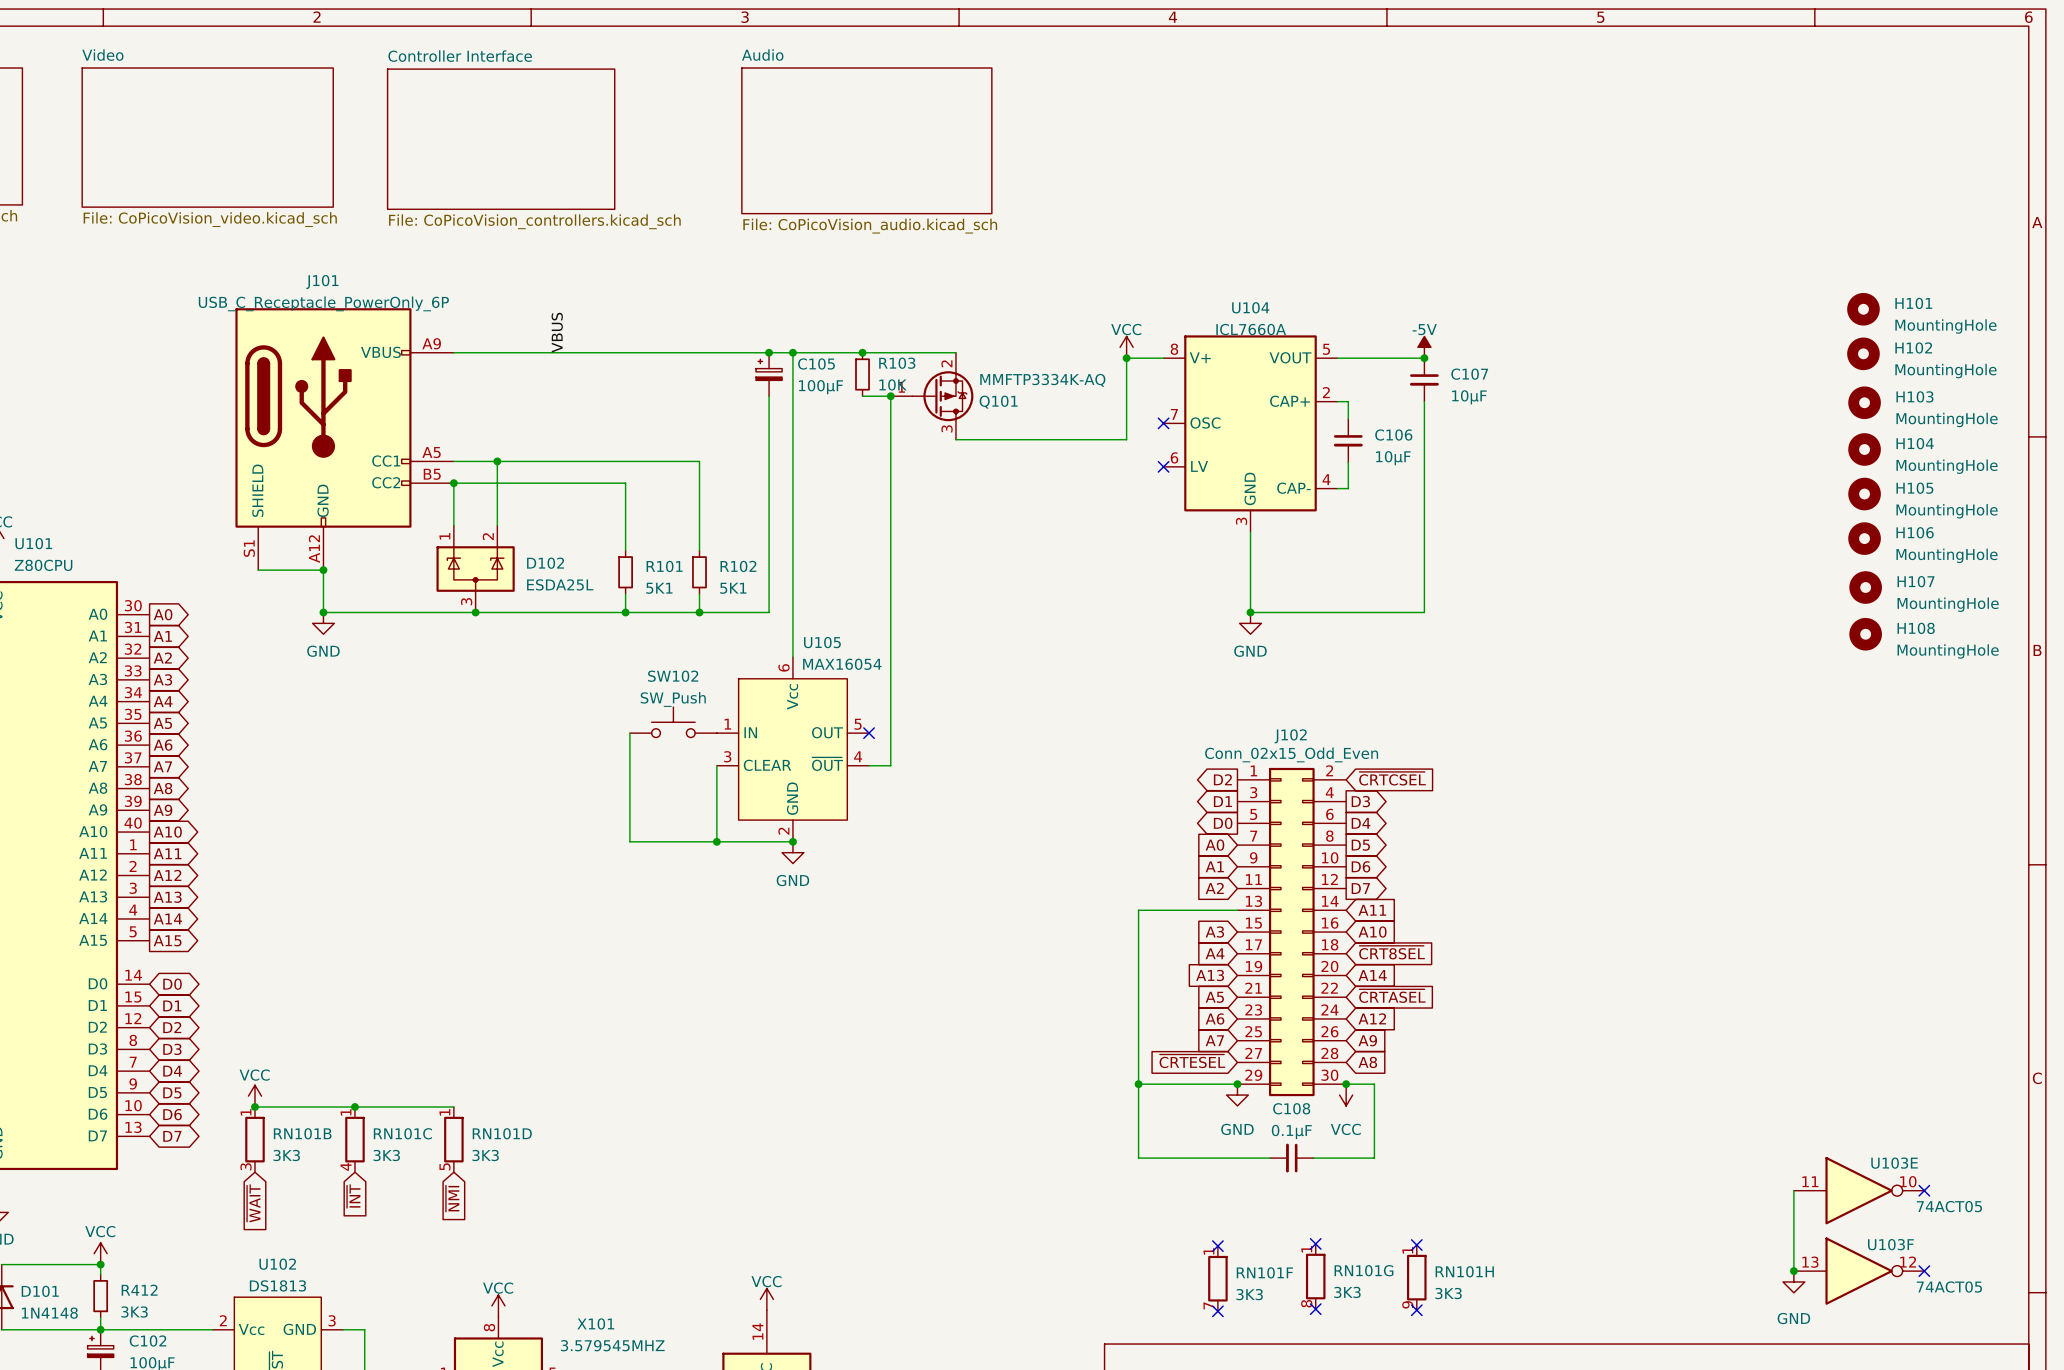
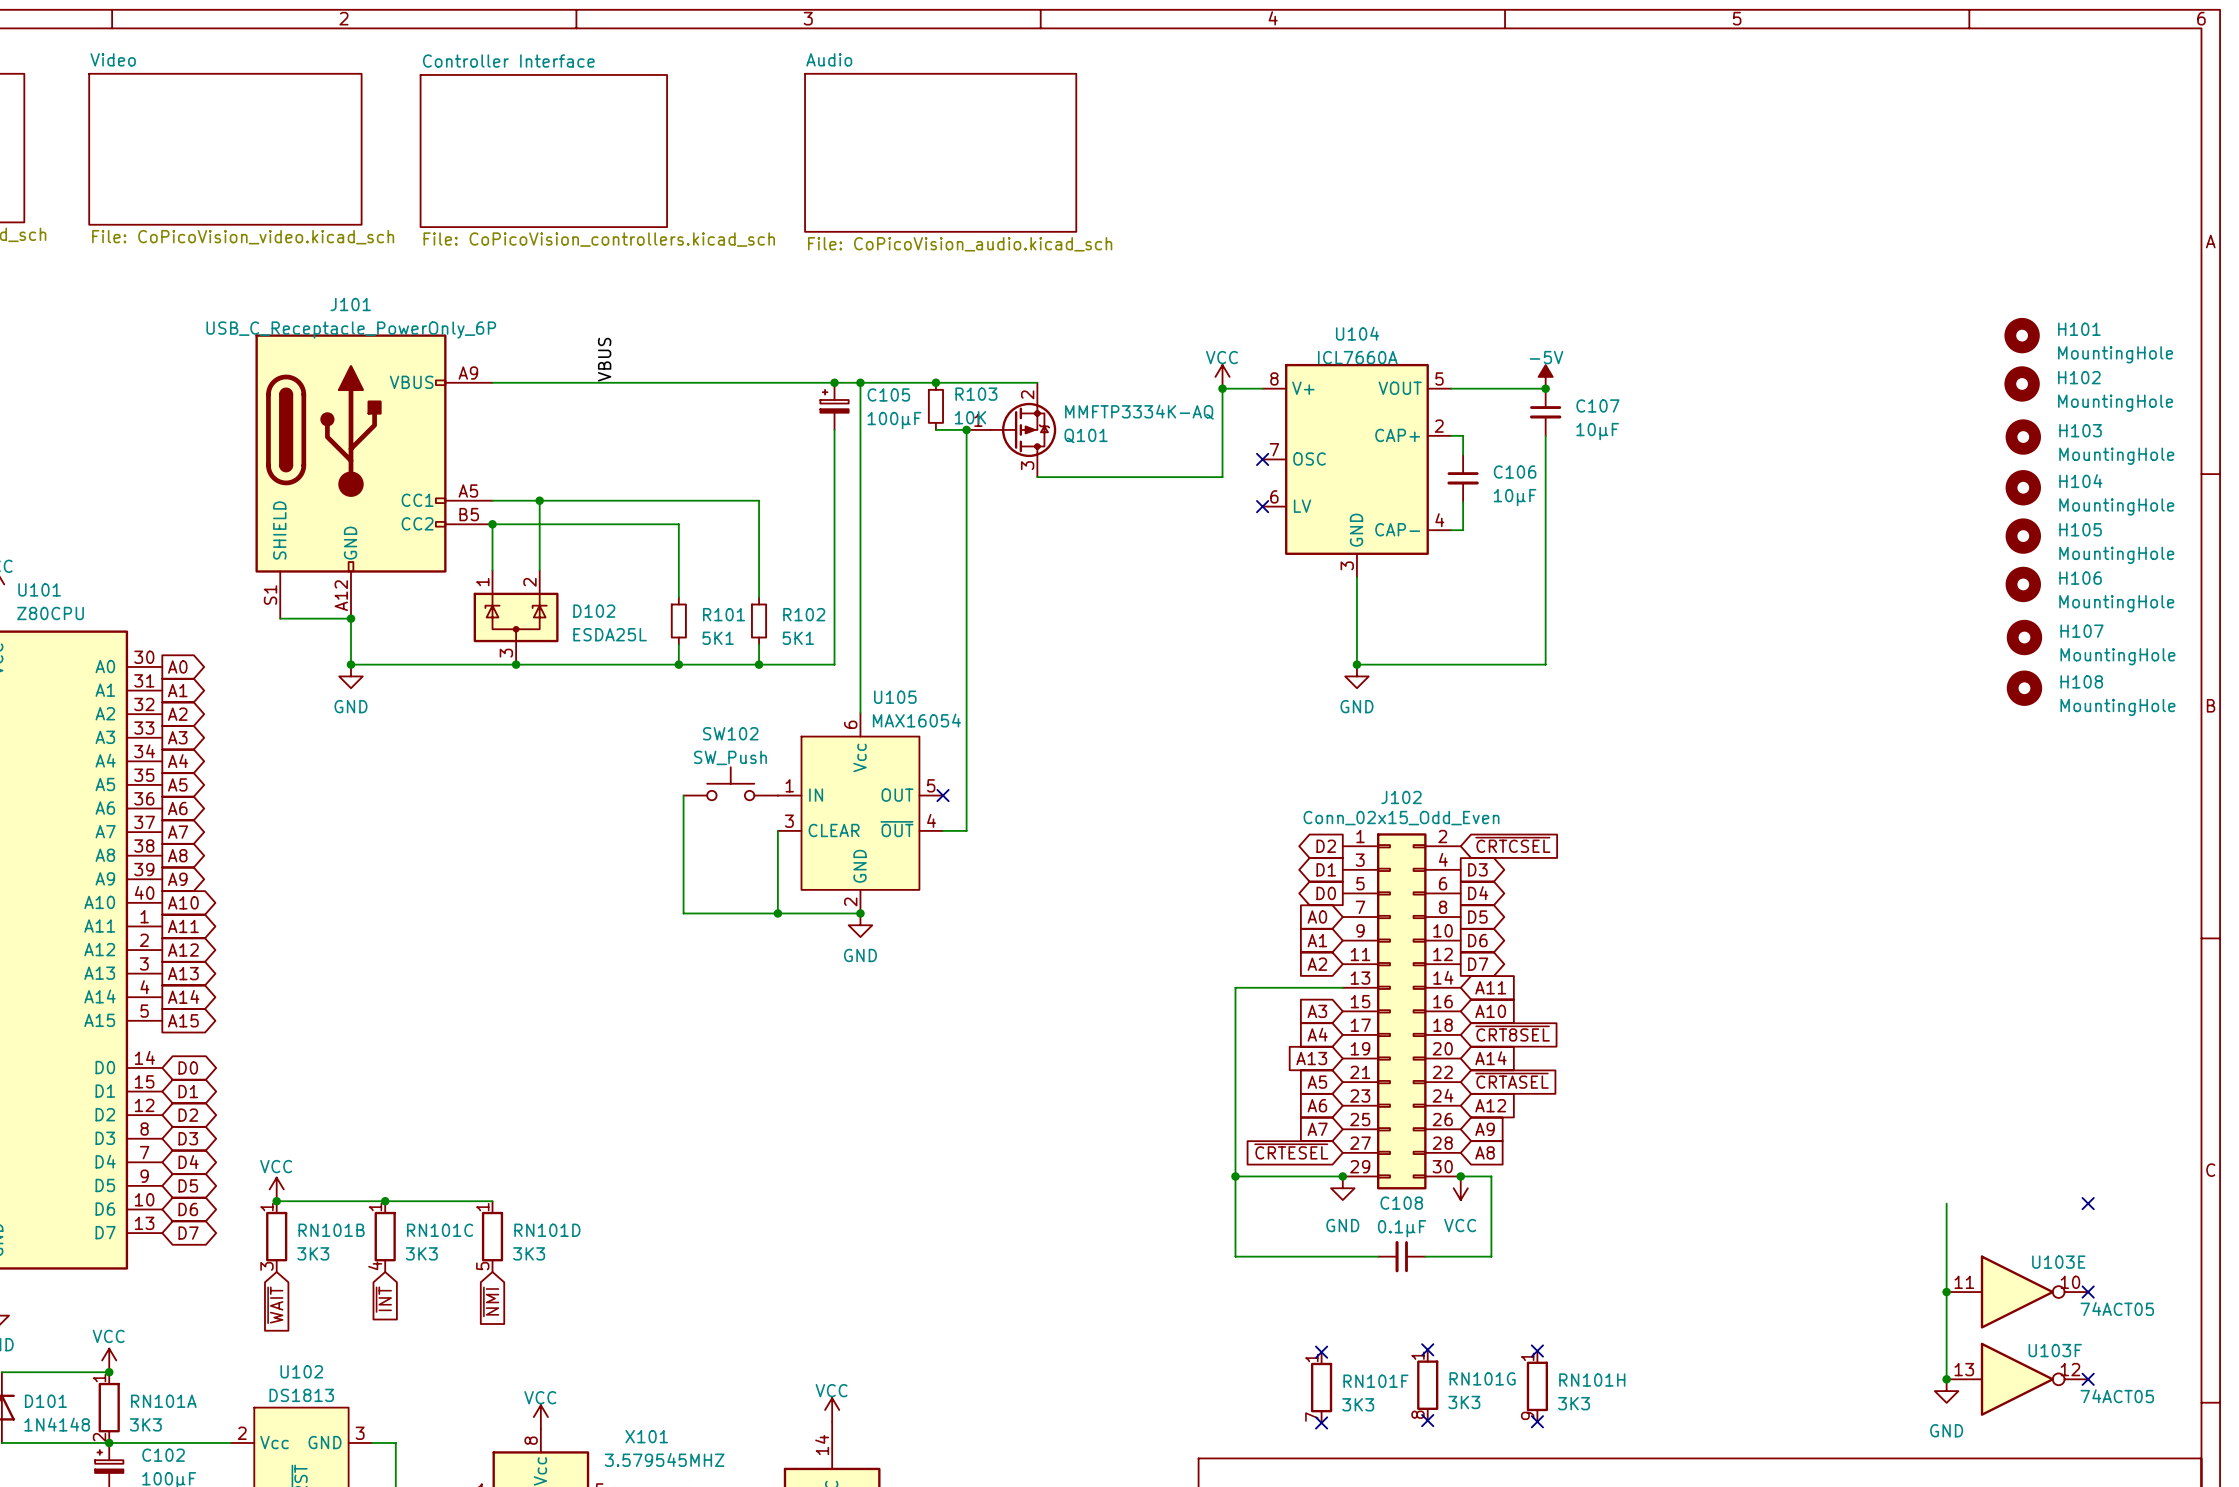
wire: none -> (1946, 1203) (1946, 1292)
no-connect mark: none -> (2088, 1203)
junction: none -> (1946, 1292)
R412: 3K3 (100, 1296) -> none
RN101A: none -> 3K3 (109, 1407)

